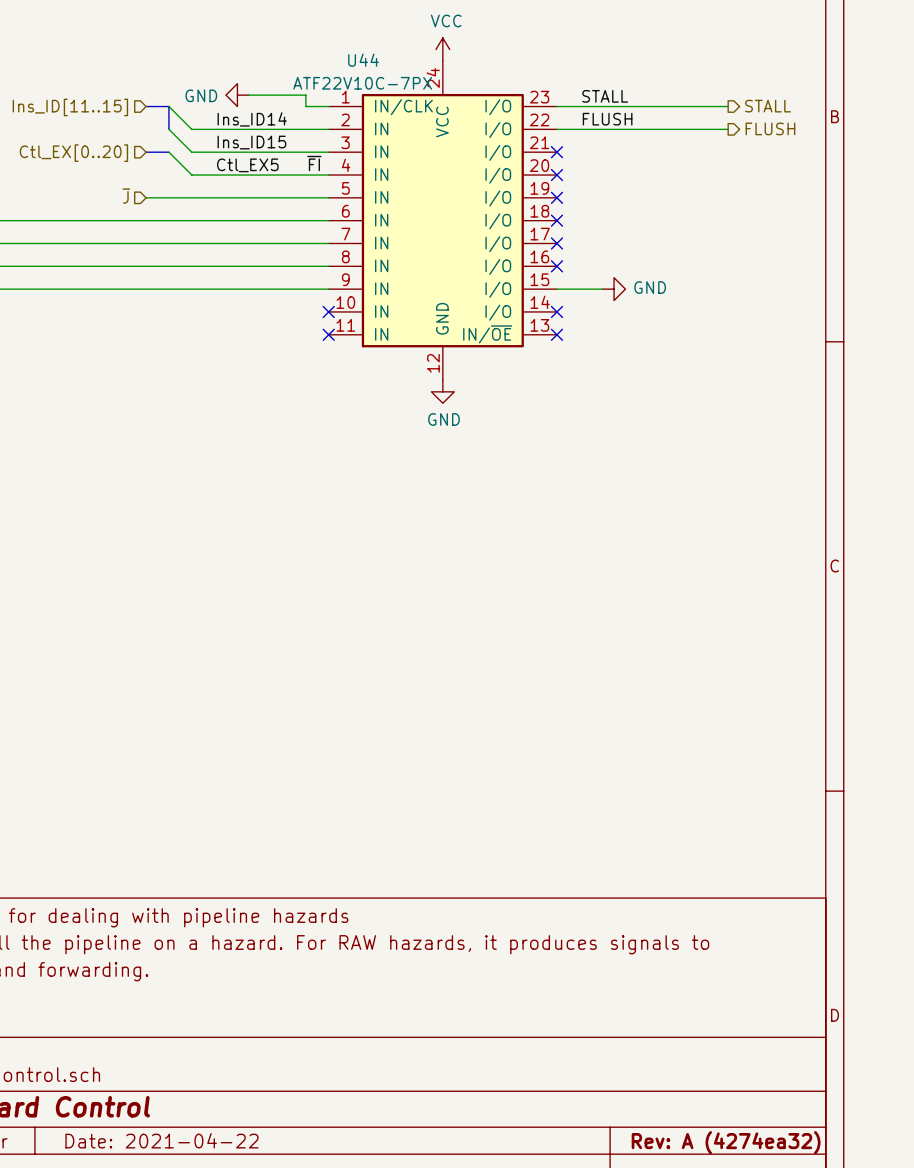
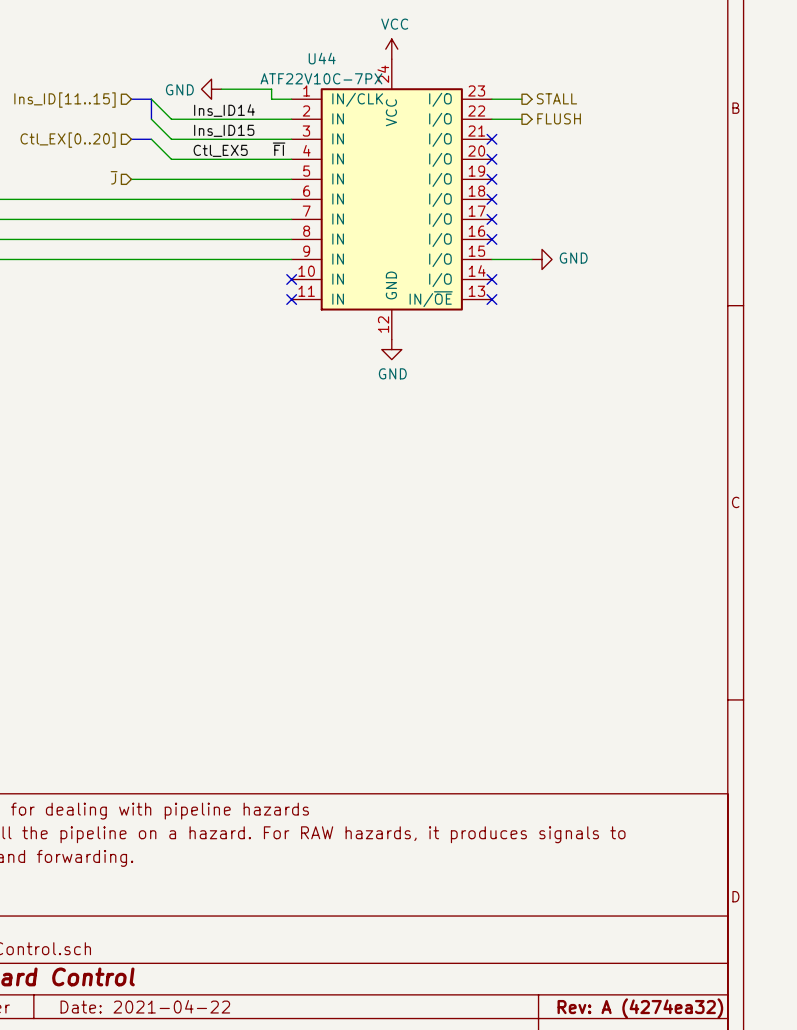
label: STALL (605, 96) -> none
wire: (591, 106) (728, 106) -> none
hierarchical label position: STALL (768, 106) -> STALL (556, 98)
label: FLUSH (607, 119) -> none
hierarchical label position: FLUSH (770, 128) -> FLUSH (559, 118)
wire: (591, 129) (728, 129) -> none

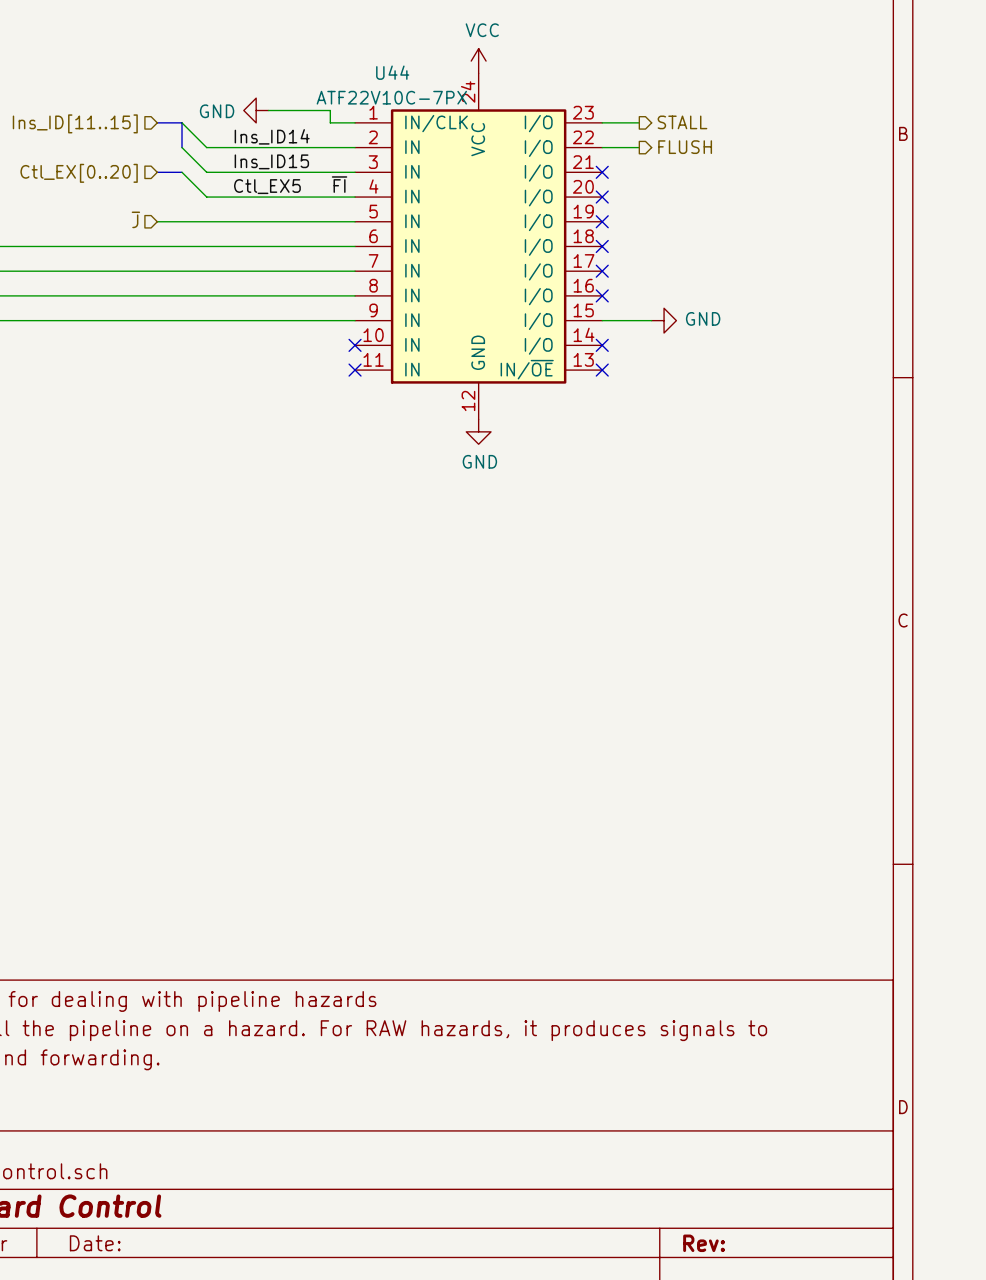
title block: Date: 2021-04-22 (145, 1006) -> Date: (95, 1243)
title block: Rev: A (4274ea32) (640, 1008) -> Rev: (704, 1243)

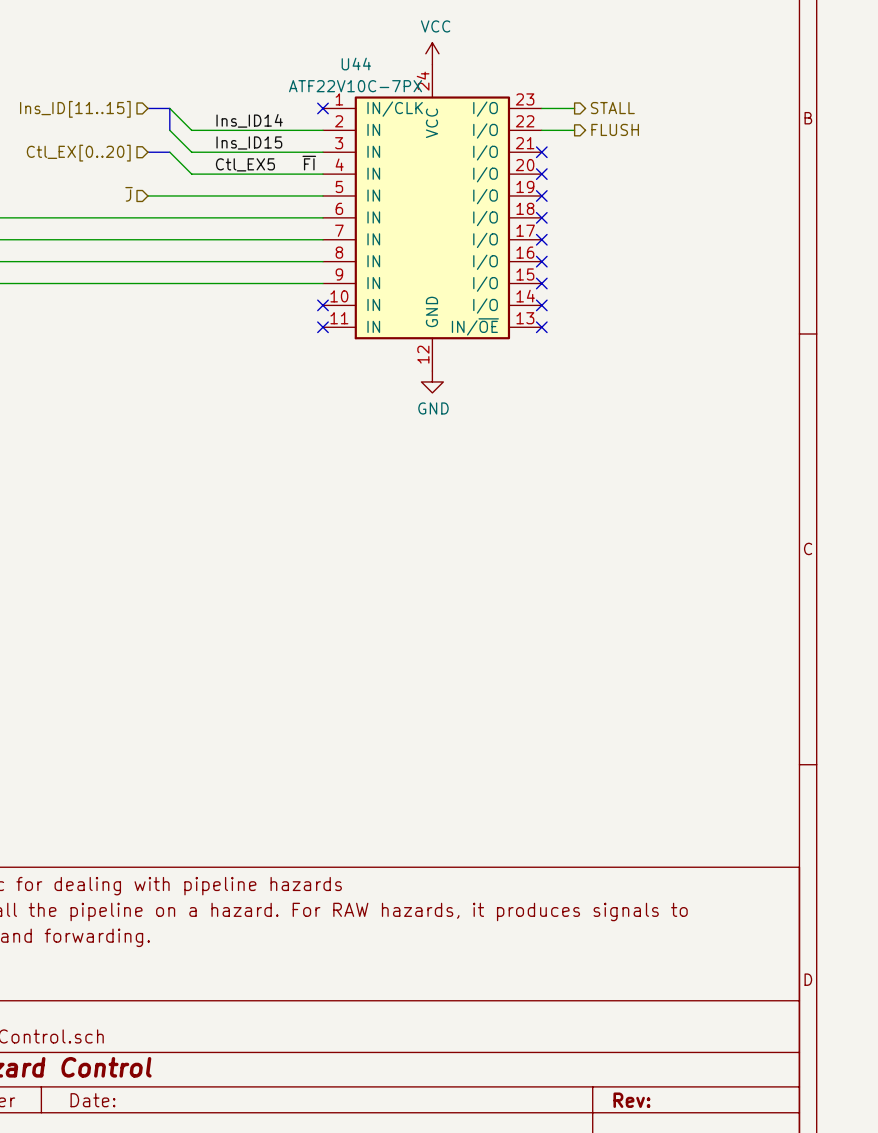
power symbol: GND (256, 110) -> none
wire: (268, 110) (330, 110) (330, 122) (355, 122) -> none
no-connect mark: none -> (322, 108)
wire: (602, 320) (651, 320) -> none
no-connect mark: none -> (541, 283)
power symbol: GND (664, 320) -> none

